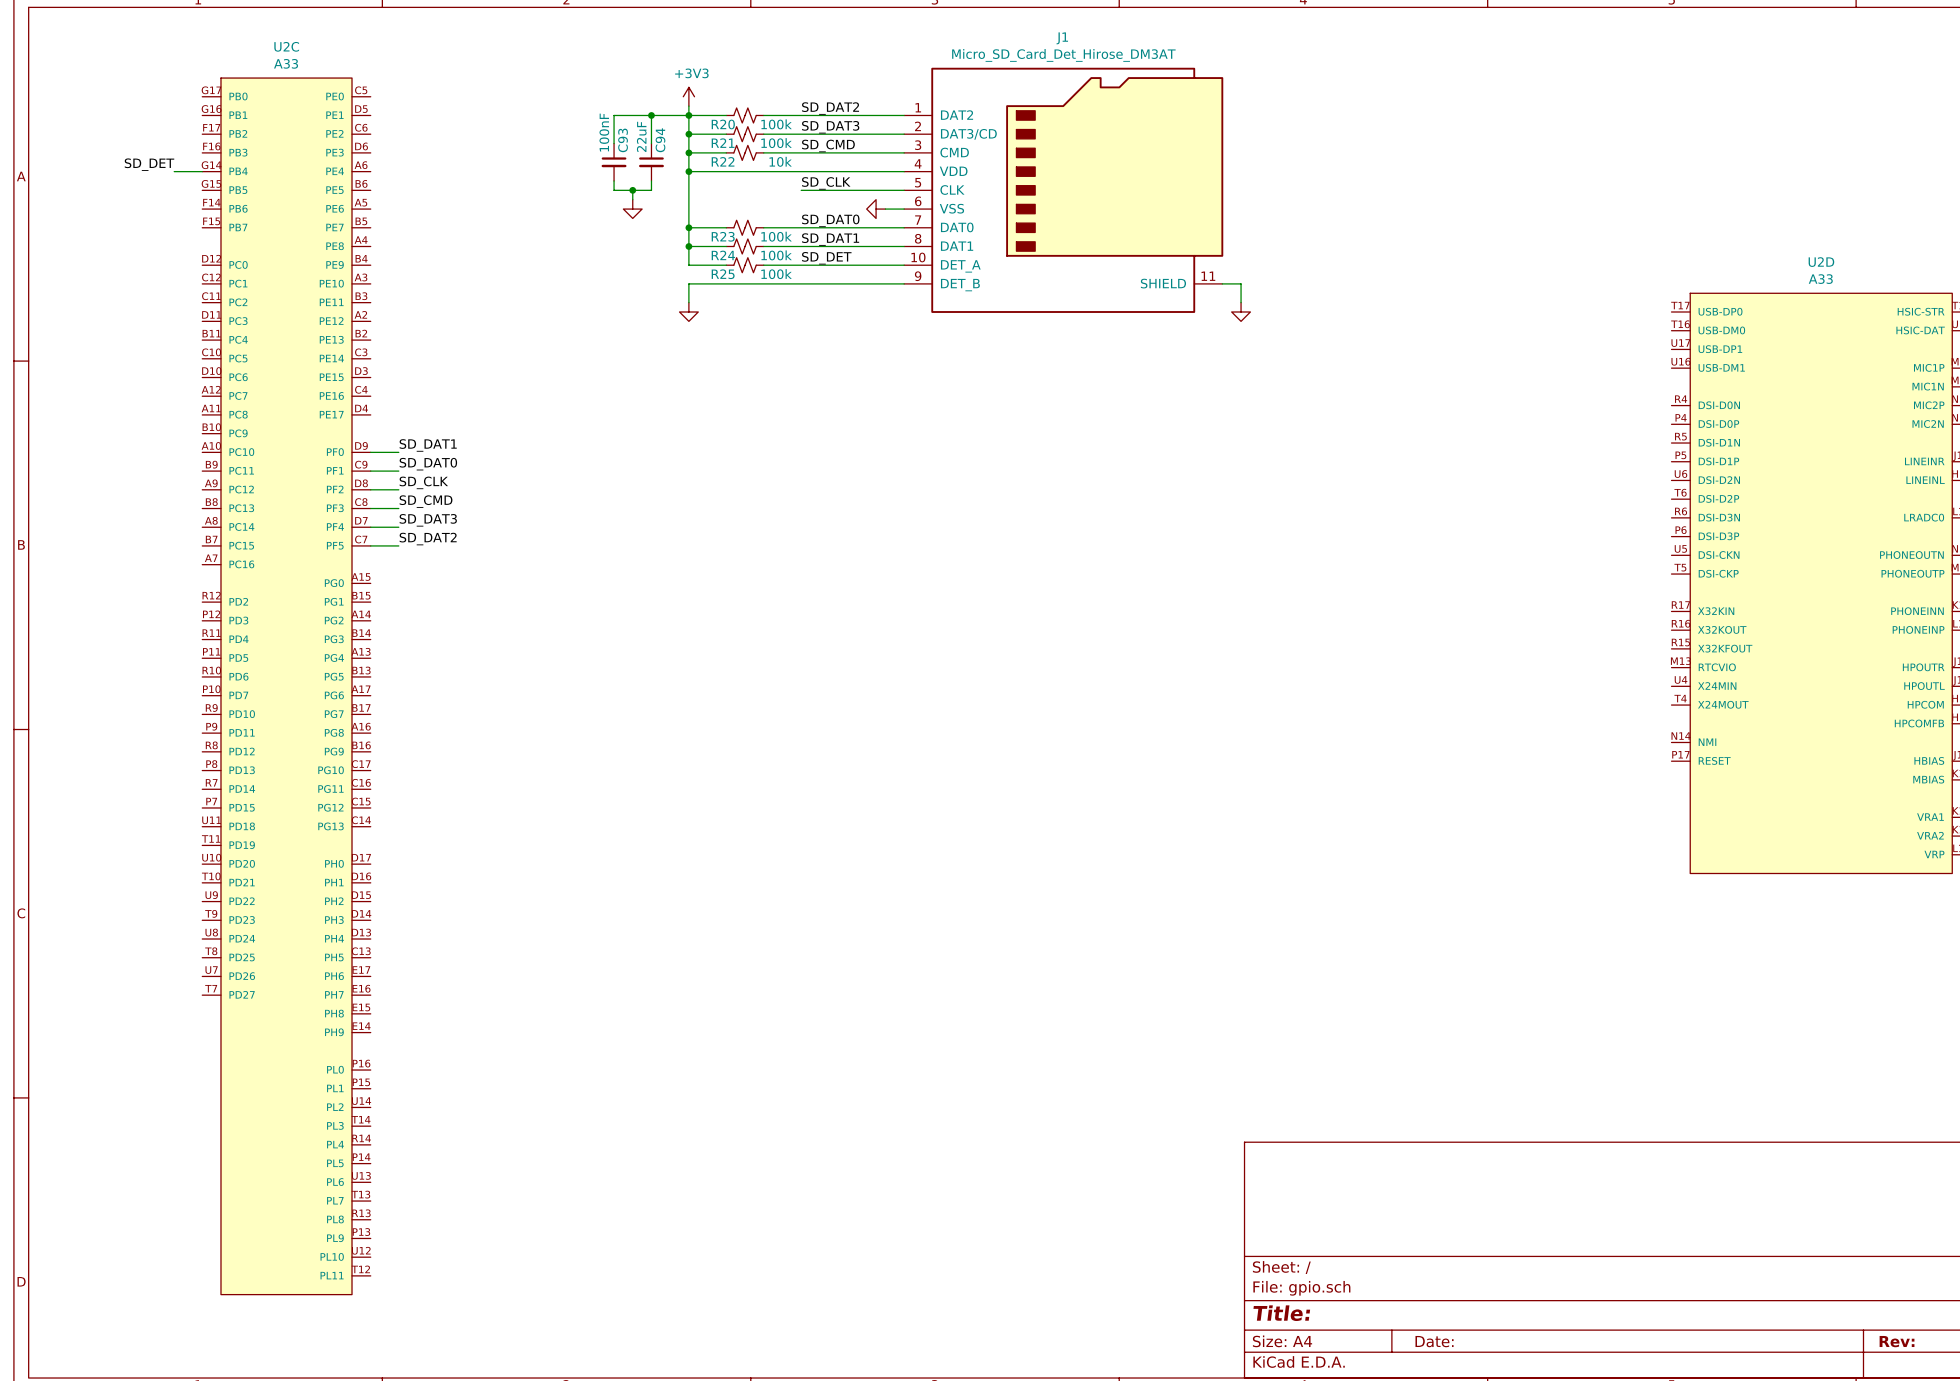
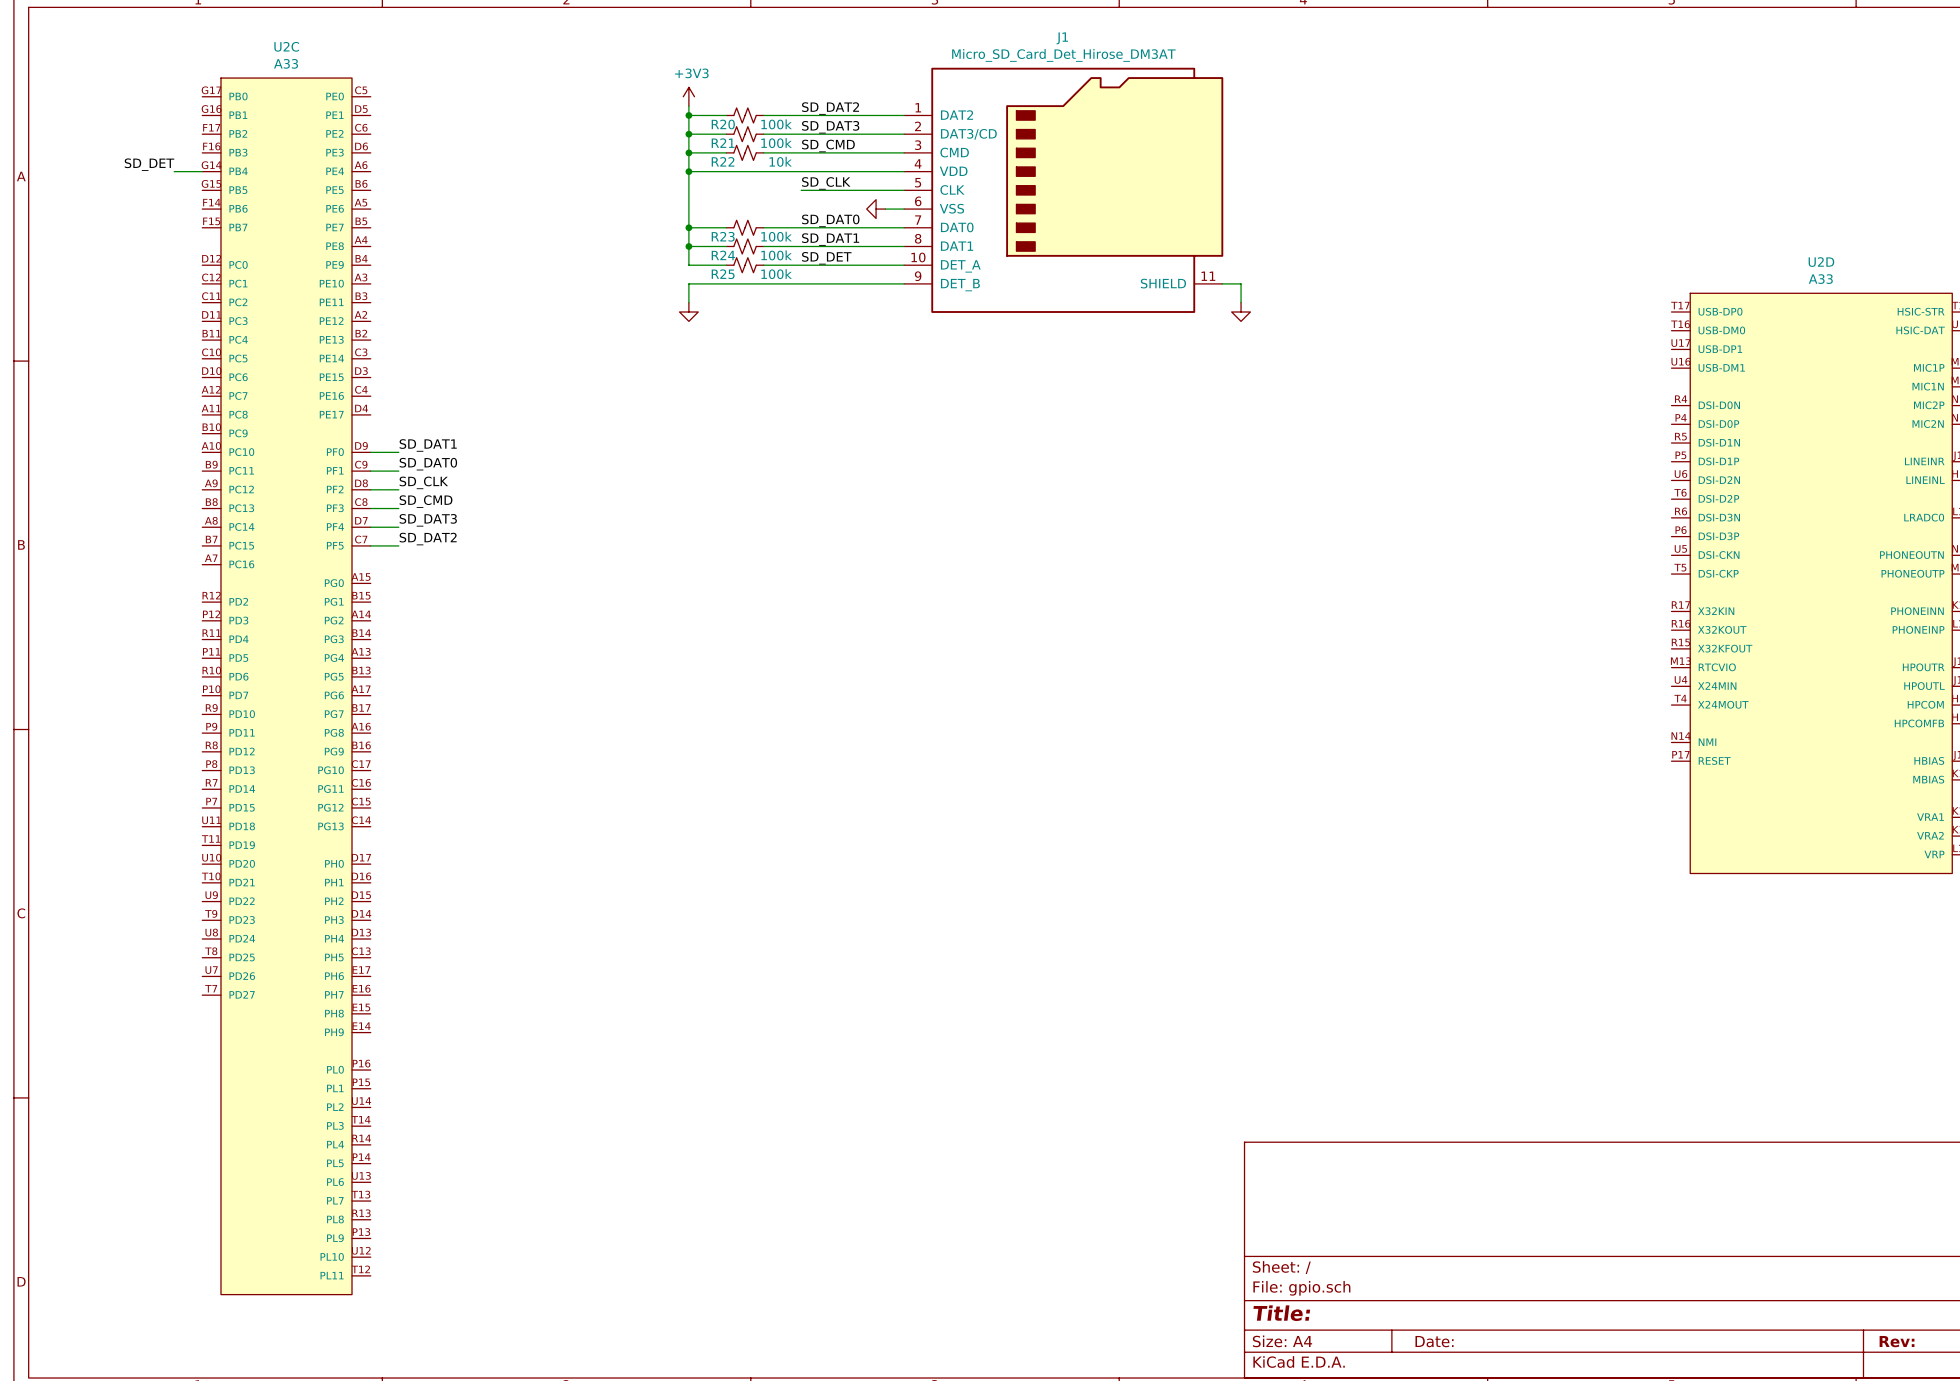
wire: (651, 115) (651, 143) -> none
junction: (651, 115) -> none
wire: (688, 115) (614, 115) (614, 143) -> none
C93: 100nF (614, 162) -> none
C94: 22uF (651, 162) -> none
wire: (614, 180) (614, 190) (651, 190) (651, 180) -> none
wire: (632, 190) (632, 199) -> none
junction: (632, 190) -> none
power symbol: (632, 209) -> none

